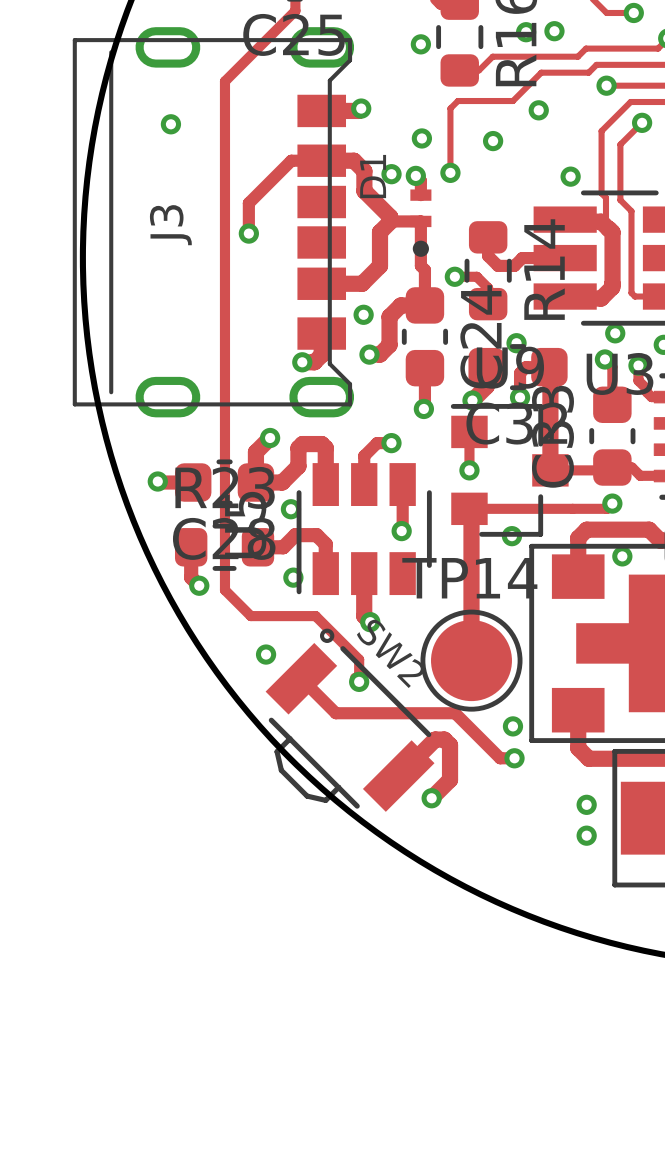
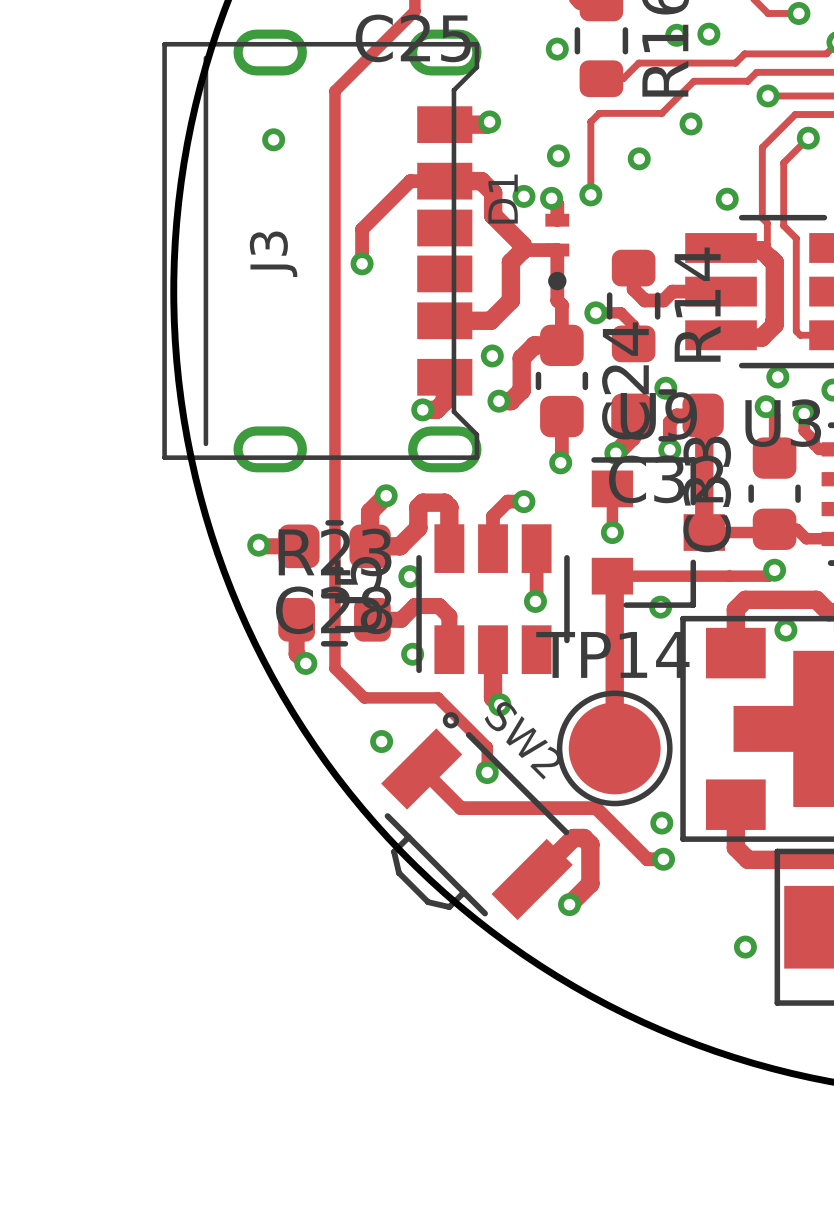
via: (586, 804) -> none

